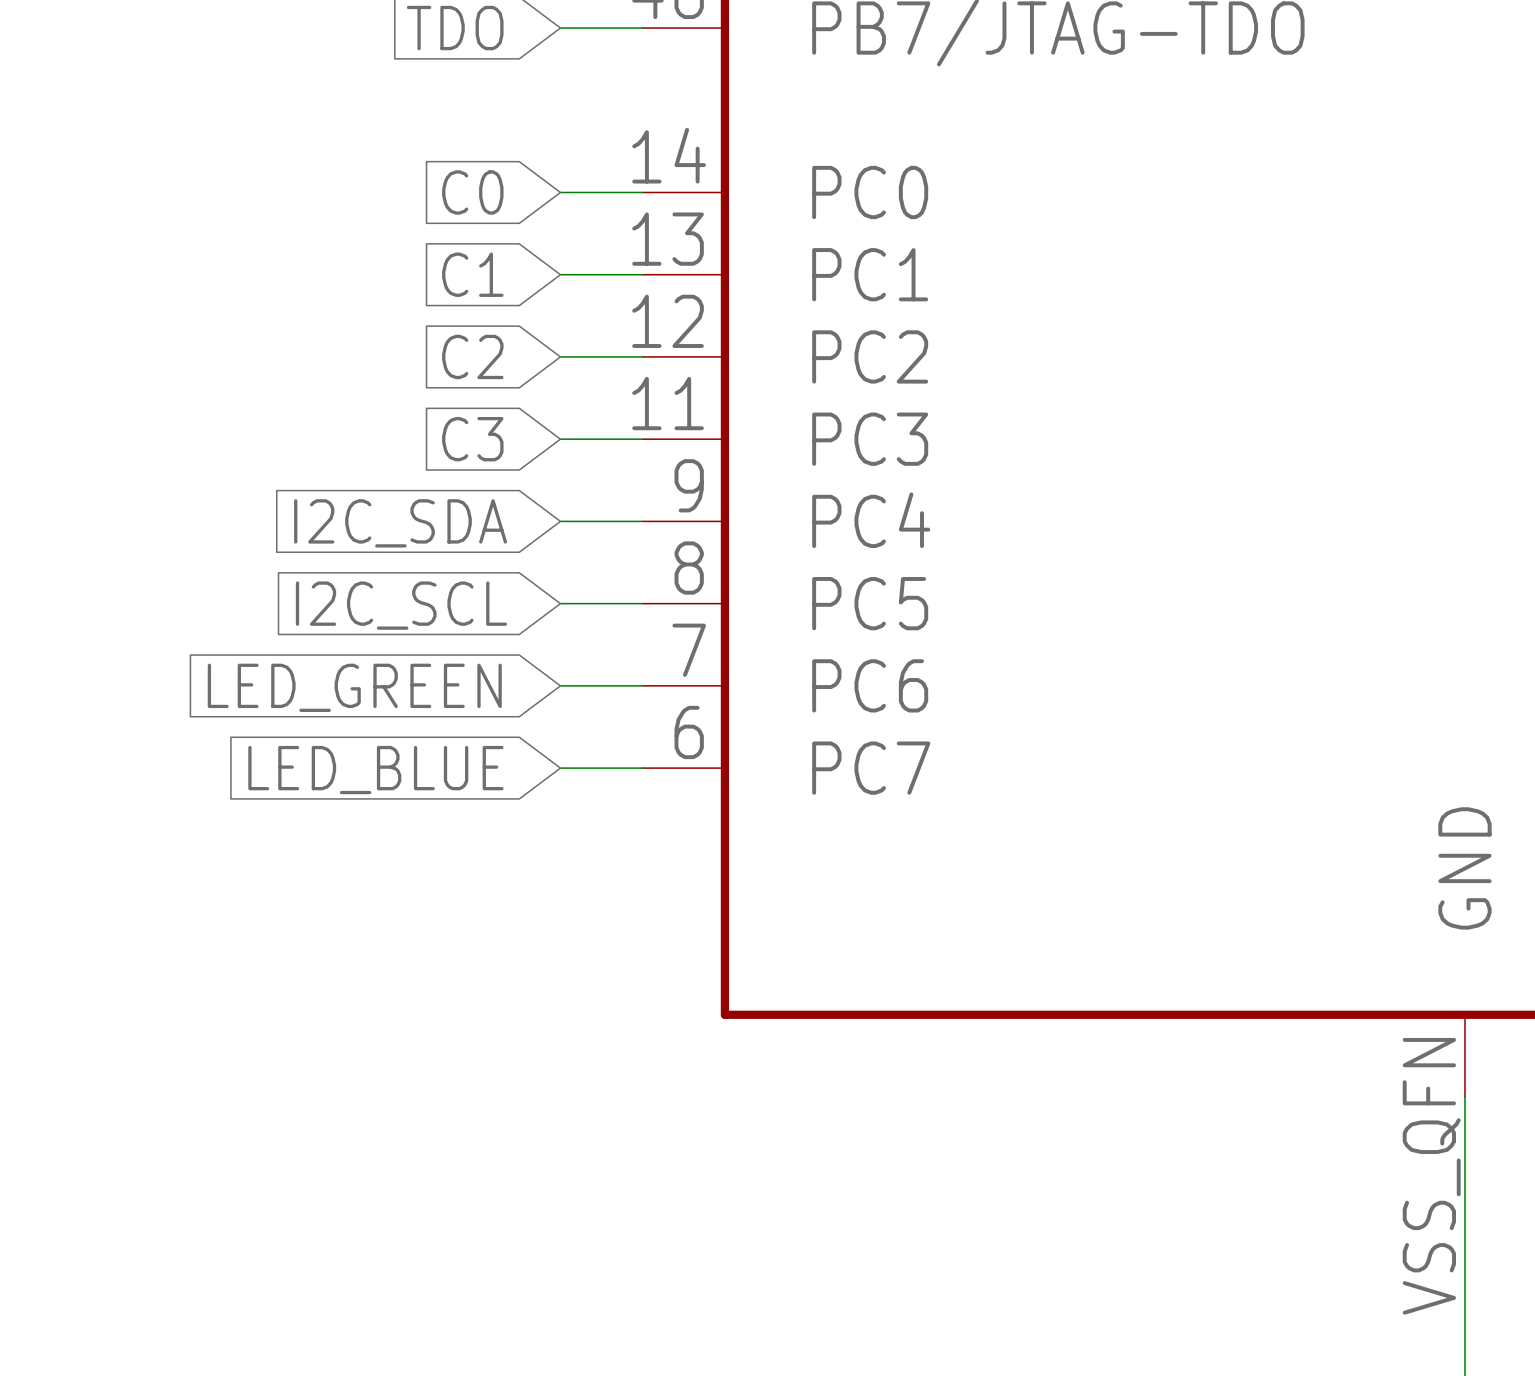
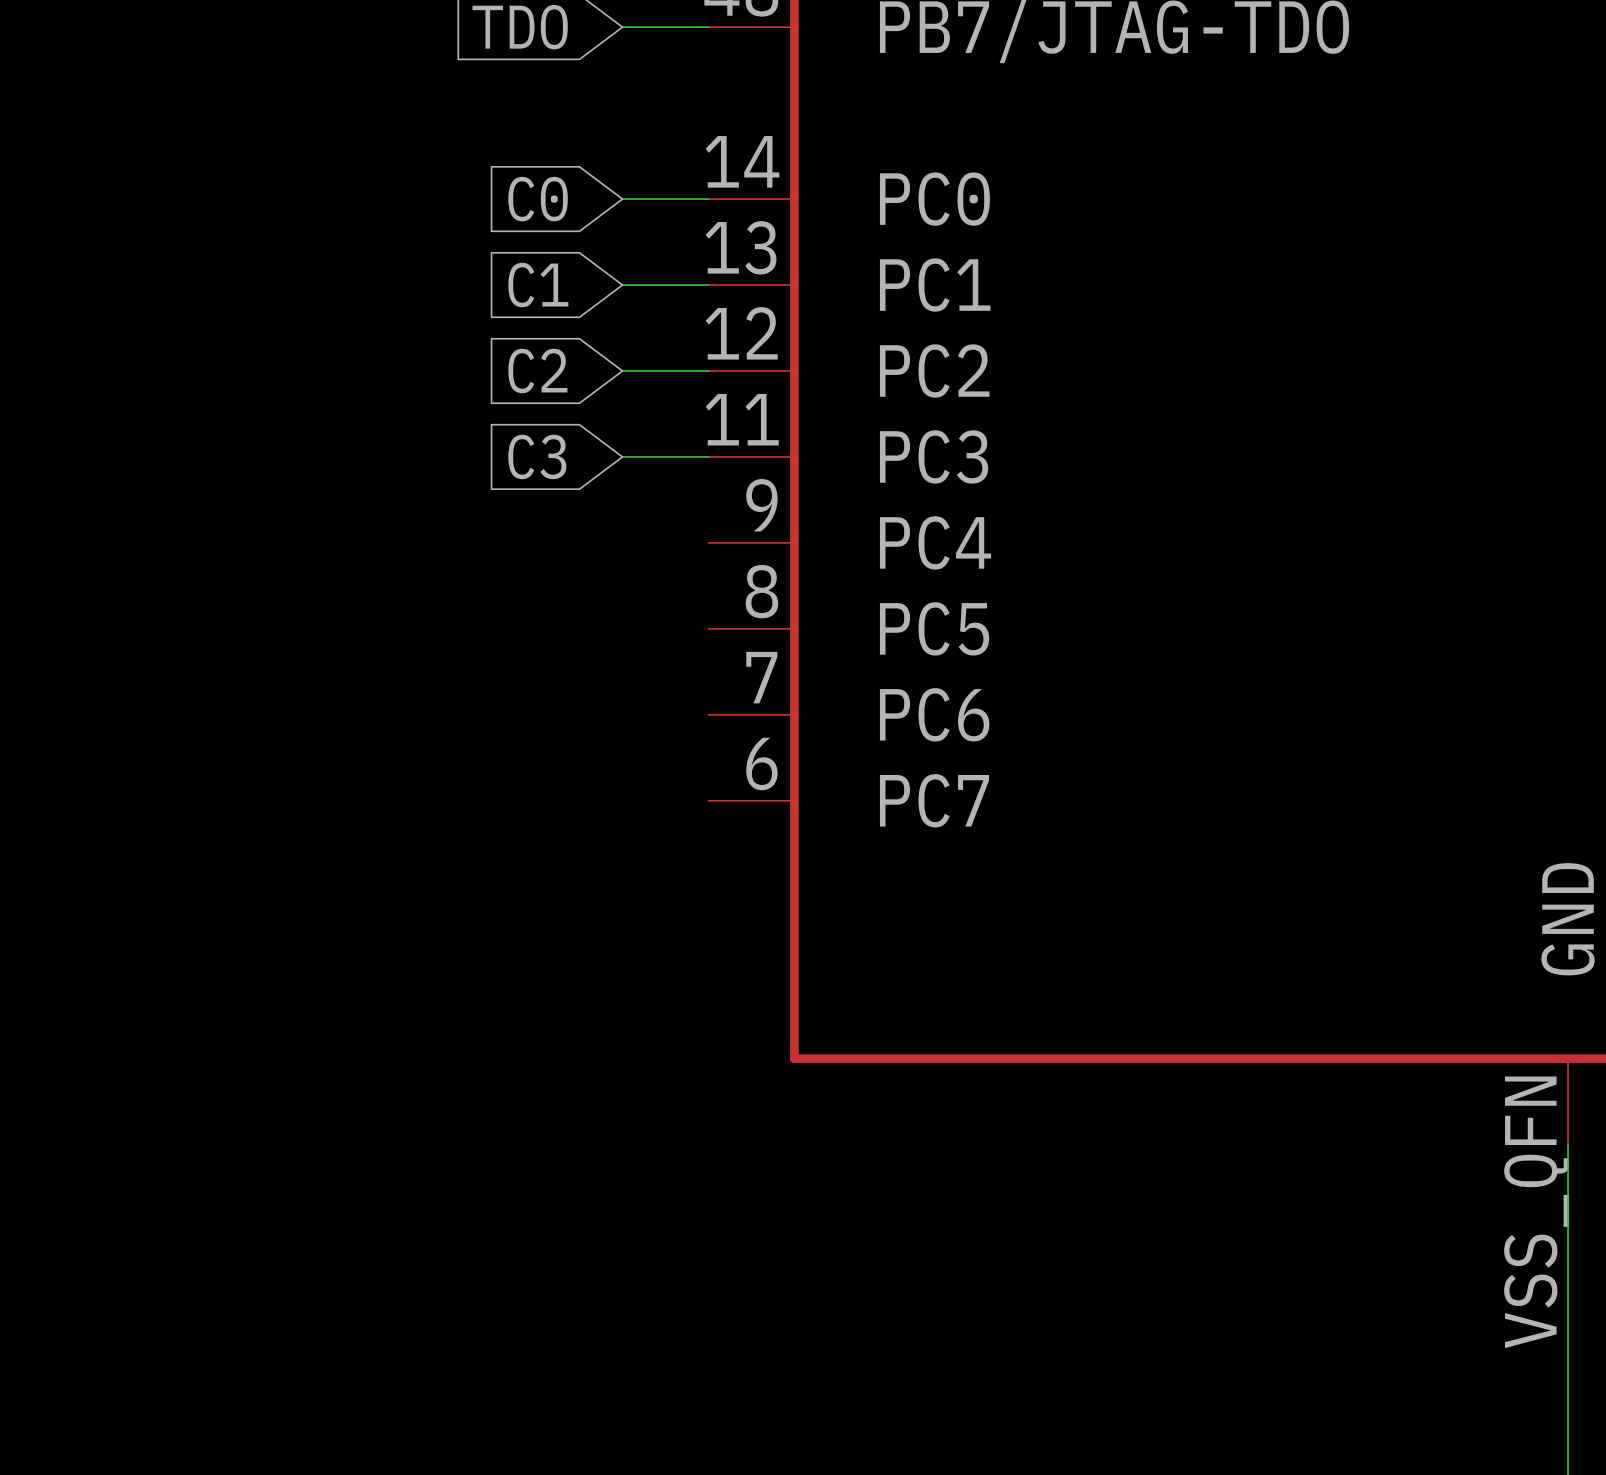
wire: (560, 521) (642, 521) -> none
global label: I2C_SDA (400, 523) -> none
wire: (560, 603) (642, 603) -> none
global label: I2C_SCL (401, 605) -> none
wire: (560, 685) (642, 685) -> none
global label: LED_GREEN (354, 687) -> none
wire: (560, 768) (642, 768) -> none
global label: LED_BLUE (375, 770) -> none

